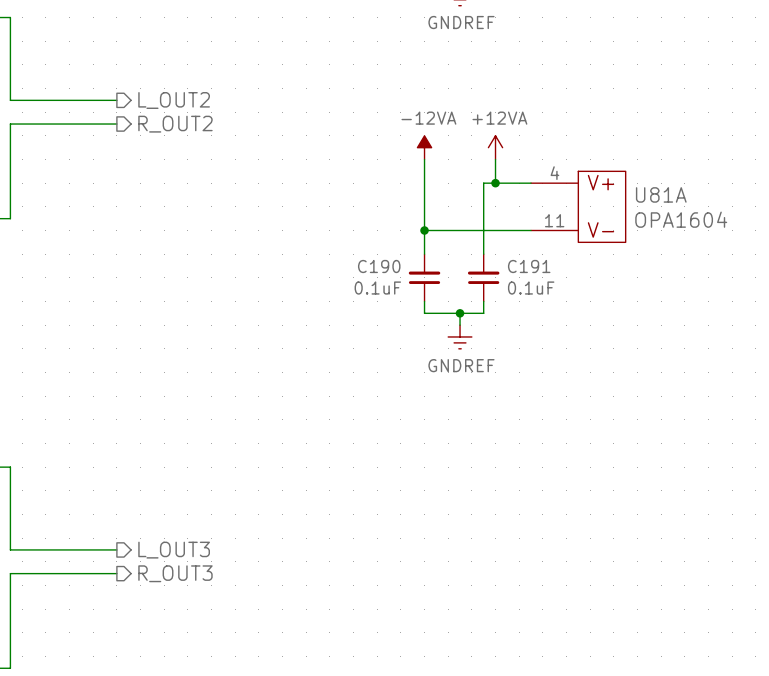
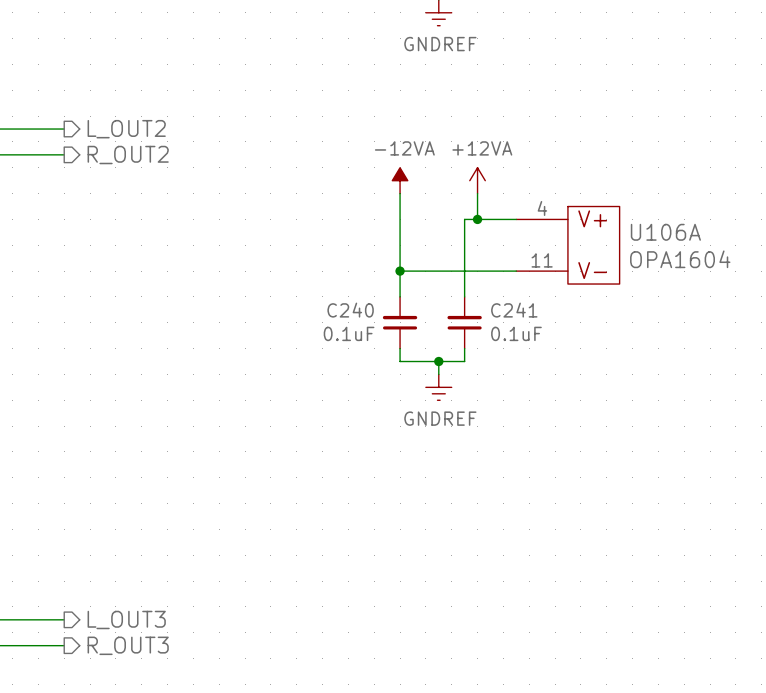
U81A name: U81A (661, 194) -> U106A (665, 232)
C190 name: C190 (379, 266) -> C240 (350, 310)
C191 name: C191 (529, 266) -> C241 (514, 310)

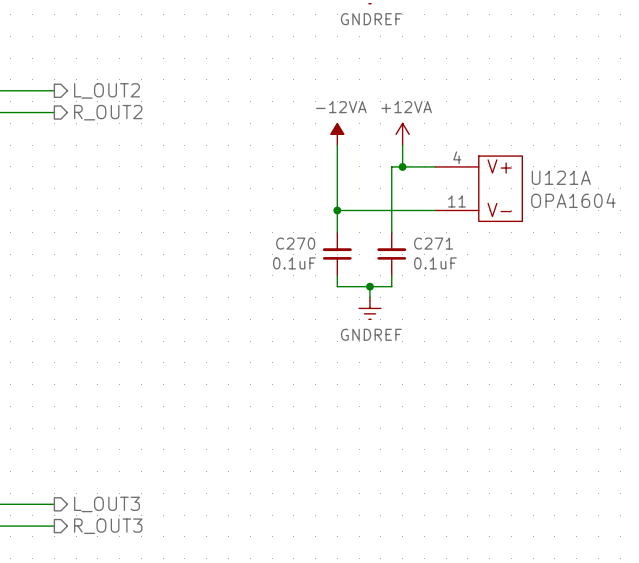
U106A name: U106A (665, 232) -> U121A (561, 177)
C240 name: C240 (350, 310) -> C270 (295, 243)
C241 name: C241 (514, 310) -> C271 (433, 243)

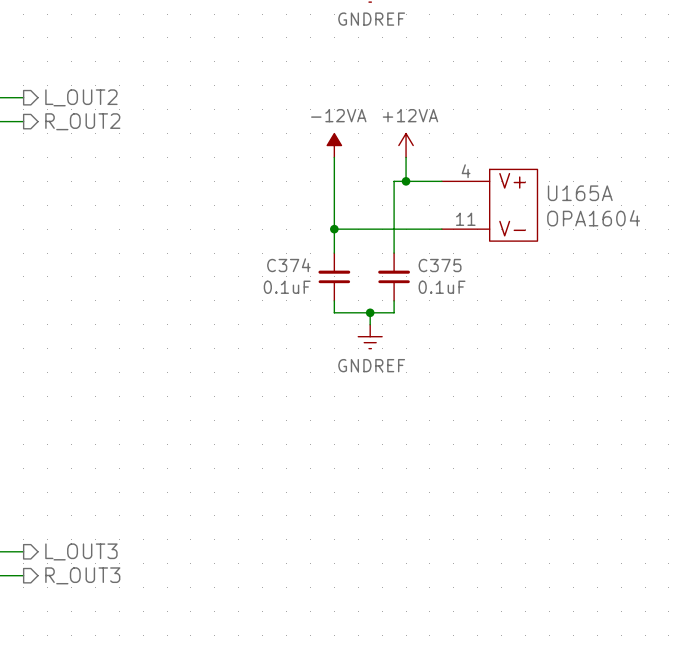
U121A name: U121A (561, 177) -> U165A (580, 193)
C270 name: C270 (295, 243) -> C374 (288, 265)
C271 name: C271 (433, 243) -> C375 (440, 265)

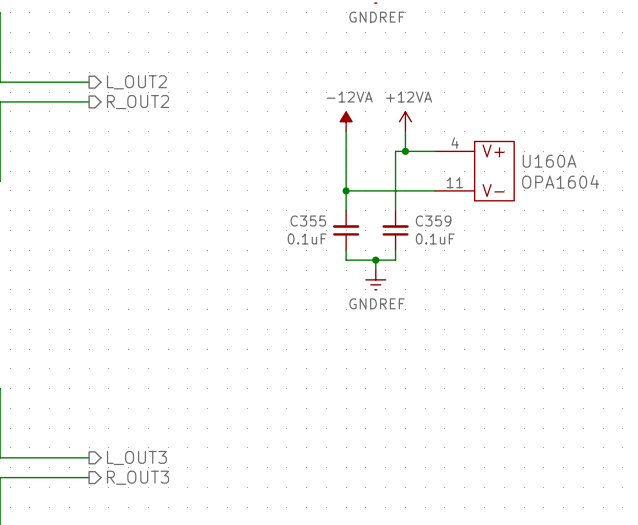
U165A name: U165A (580, 193) -> U160A (549, 161)
C374 name: C374 (288, 265) -> C355 (308, 221)
C375 name: C375 (440, 265) -> C359 (433, 221)

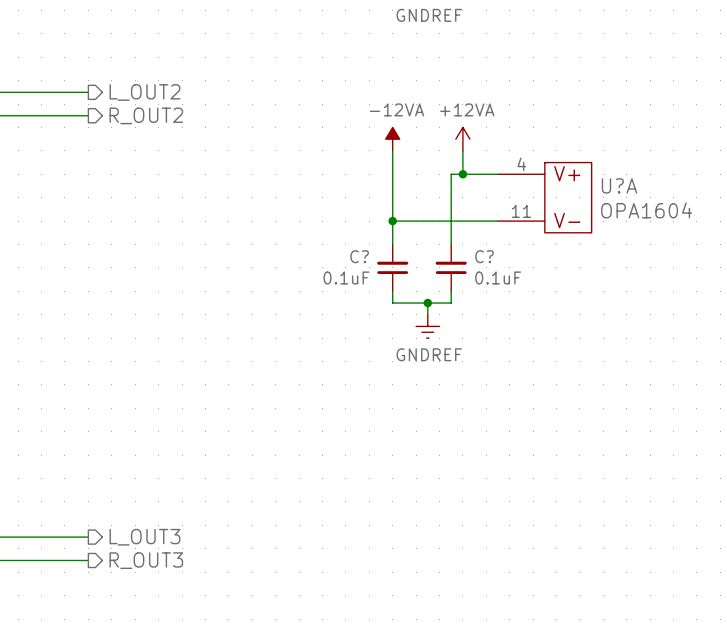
U160A name: U160A (549, 161) -> U?A (619, 185)
C355 name: C355 (308, 221) -> C? (359, 256)
C359 name: C359 (433, 221) -> C? (484, 256)

